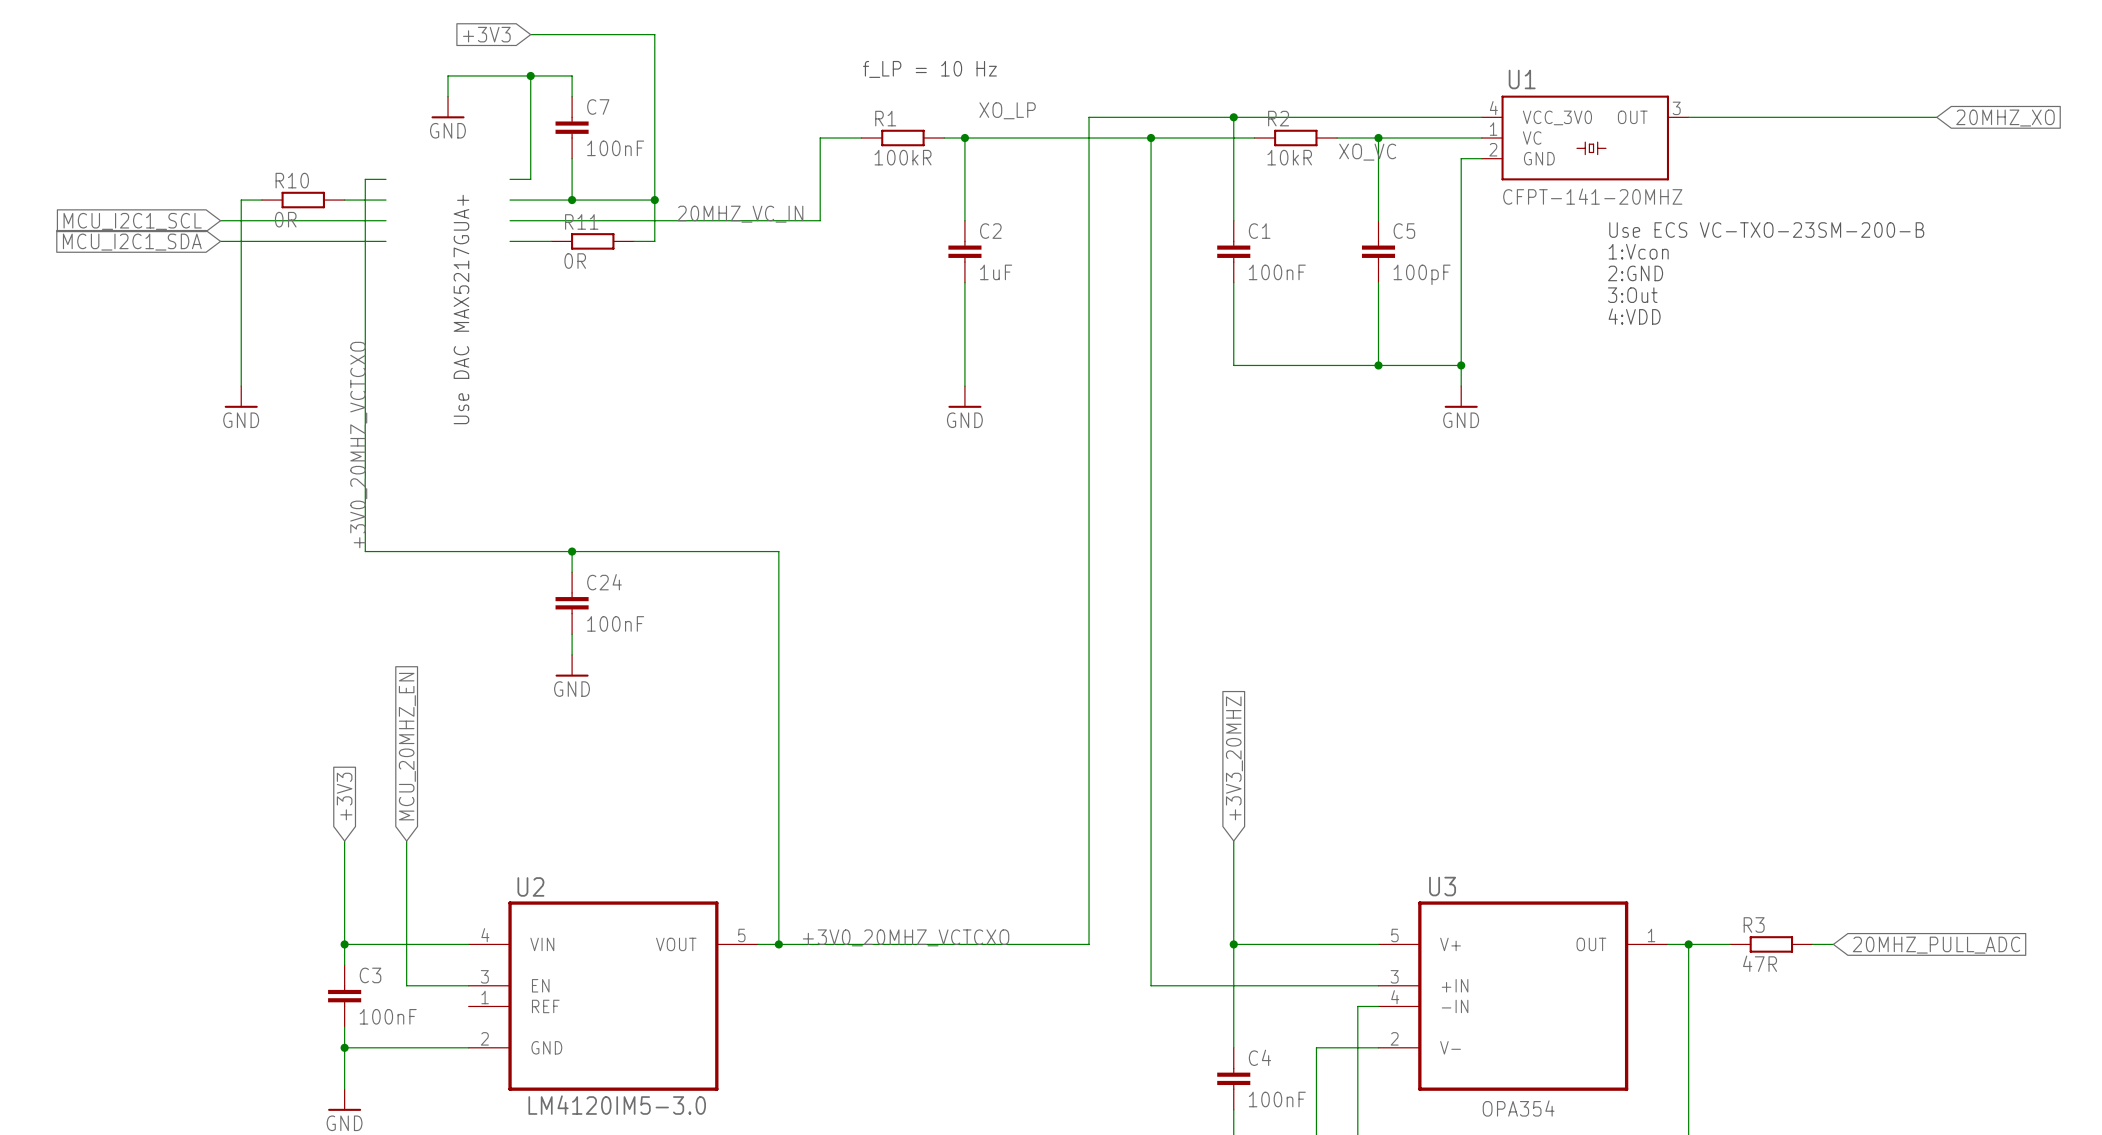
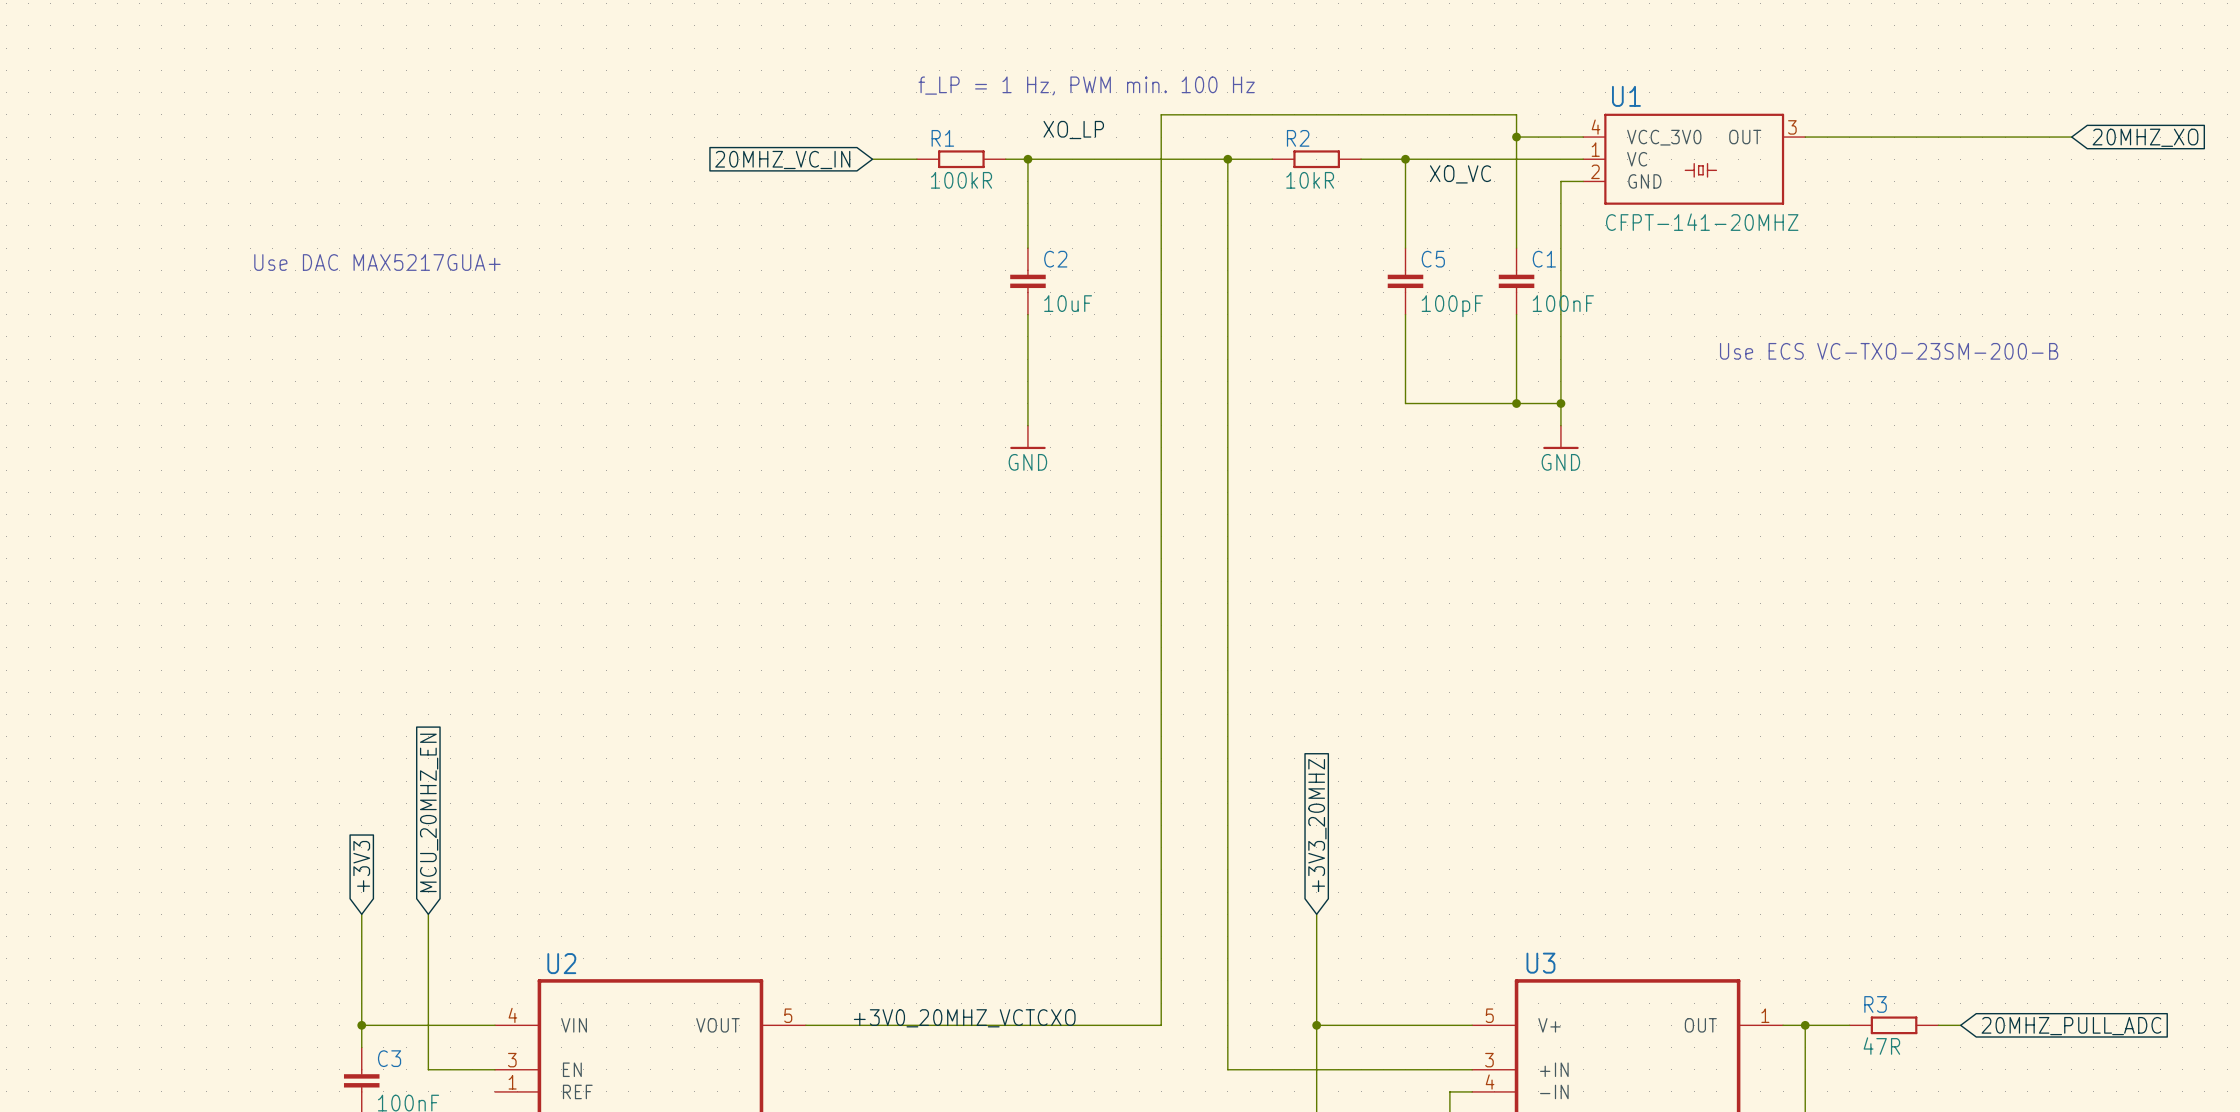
global label: +3V3 (486, 34) -> none
wire: (530, 34) (654, 34) (654, 241) (634, 241) -> none
text: f_LP = 10 Hz (929, 69) -> f_LP = 1 Hz, PWM min. 100 Hz (1086, 85)
wire: (530, 75) (530, 179) (510, 179) -> none
junction: (530, 75) -> none
wire: (448, 96) (448, 75) (572, 75) (572, 96) -> none
power symbol: GND (448, 107) -> none
wire: (1089, 117) (1419, 117) -> (1161, 137) (1161, 114) (1516, 114) (1516, 248)
wire: (1233, 117) (1233, 220) -> none
junction: (1233, 117) -> none
junction: none -> (1516, 137)
C7: 100nF (572, 127) -> none
global label: none -> 20MHZ_VC_IN (782, 159)
wire: (820, 138) (820, 220) (510, 220) -> none
wire: (1192, 138) (1254, 138) -> (1361, 159) (1427, 159)
R2 position: (1295, 138) -> (1316, 159)
junction: none -> (1405, 159)
wire: (1378, 138) (1378, 220) -> (1405, 159) (1405, 248)
junction: (1378, 138) -> none
wire: (572, 158) (572, 200) -> none
wire: (385, 179) (365, 179) (365, 551) (778, 551) (778, 944) -> none
wire: (261, 200) (241, 200) (241, 386) -> none
R10: 0R (303, 200) -> none
wire: (344, 200) (385, 200) -> none
wire: (510, 200) (654, 200) -> none
junction: (572, 200) -> none
junction: (654, 200) -> none
label: 20MHZ_VC_IN (740, 214) -> none
wire: (220, 220) (385, 220) -> none
global label: MCU_I2C1_SCL (132, 221) -> none
text: Use ECS VC-TXO-23SM-200-B (1766, 230) -> none
text: none -> Use DAC MAX5217GUA+ (377, 262)
wire: (220, 241) (385, 241) -> none
wire: (510, 241) (551, 241) -> none
R11: 0R (592, 241) -> none
global label: MCU_I2C1_SDA (132, 242) -> none
C1 position: (1233, 251) -> (1516, 281)
C5 position: (1378, 251) -> (1405, 281)
text: 1:Vcon (1638, 251) -> none
C2 value: 1uF (996, 272) -> 10uF (1068, 303)
text: 2:GND (1635, 273) -> none
wire: (1233, 282) (1233, 365) (1316, 365) -> (1405, 314) (1405, 403)
wire: (1378, 282) (1378, 365) -> (1516, 314) (1516, 403)
text: 3:Out (1632, 295) -> none
text: Use DAC MAX5217GUA+ (461, 309) -> none
text: 4:VDD (1634, 316) -> Use ECS VC-TXO-23SM-200-B (1889, 351)
junction position: (1378, 365) -> (1516, 403)
power symbol: GND (241, 396) -> none
label: +3V0_20MHZ_VCTCXO (358, 445) -> none
wire: (572, 551) (572, 572) -> none
junction: (572, 551) -> none
C24: 100nF (572, 603) -> none
wire: (572, 634) (572, 654) -> none
power symbol: GND (572, 665) -> none
junction: (778, 944) -> none

